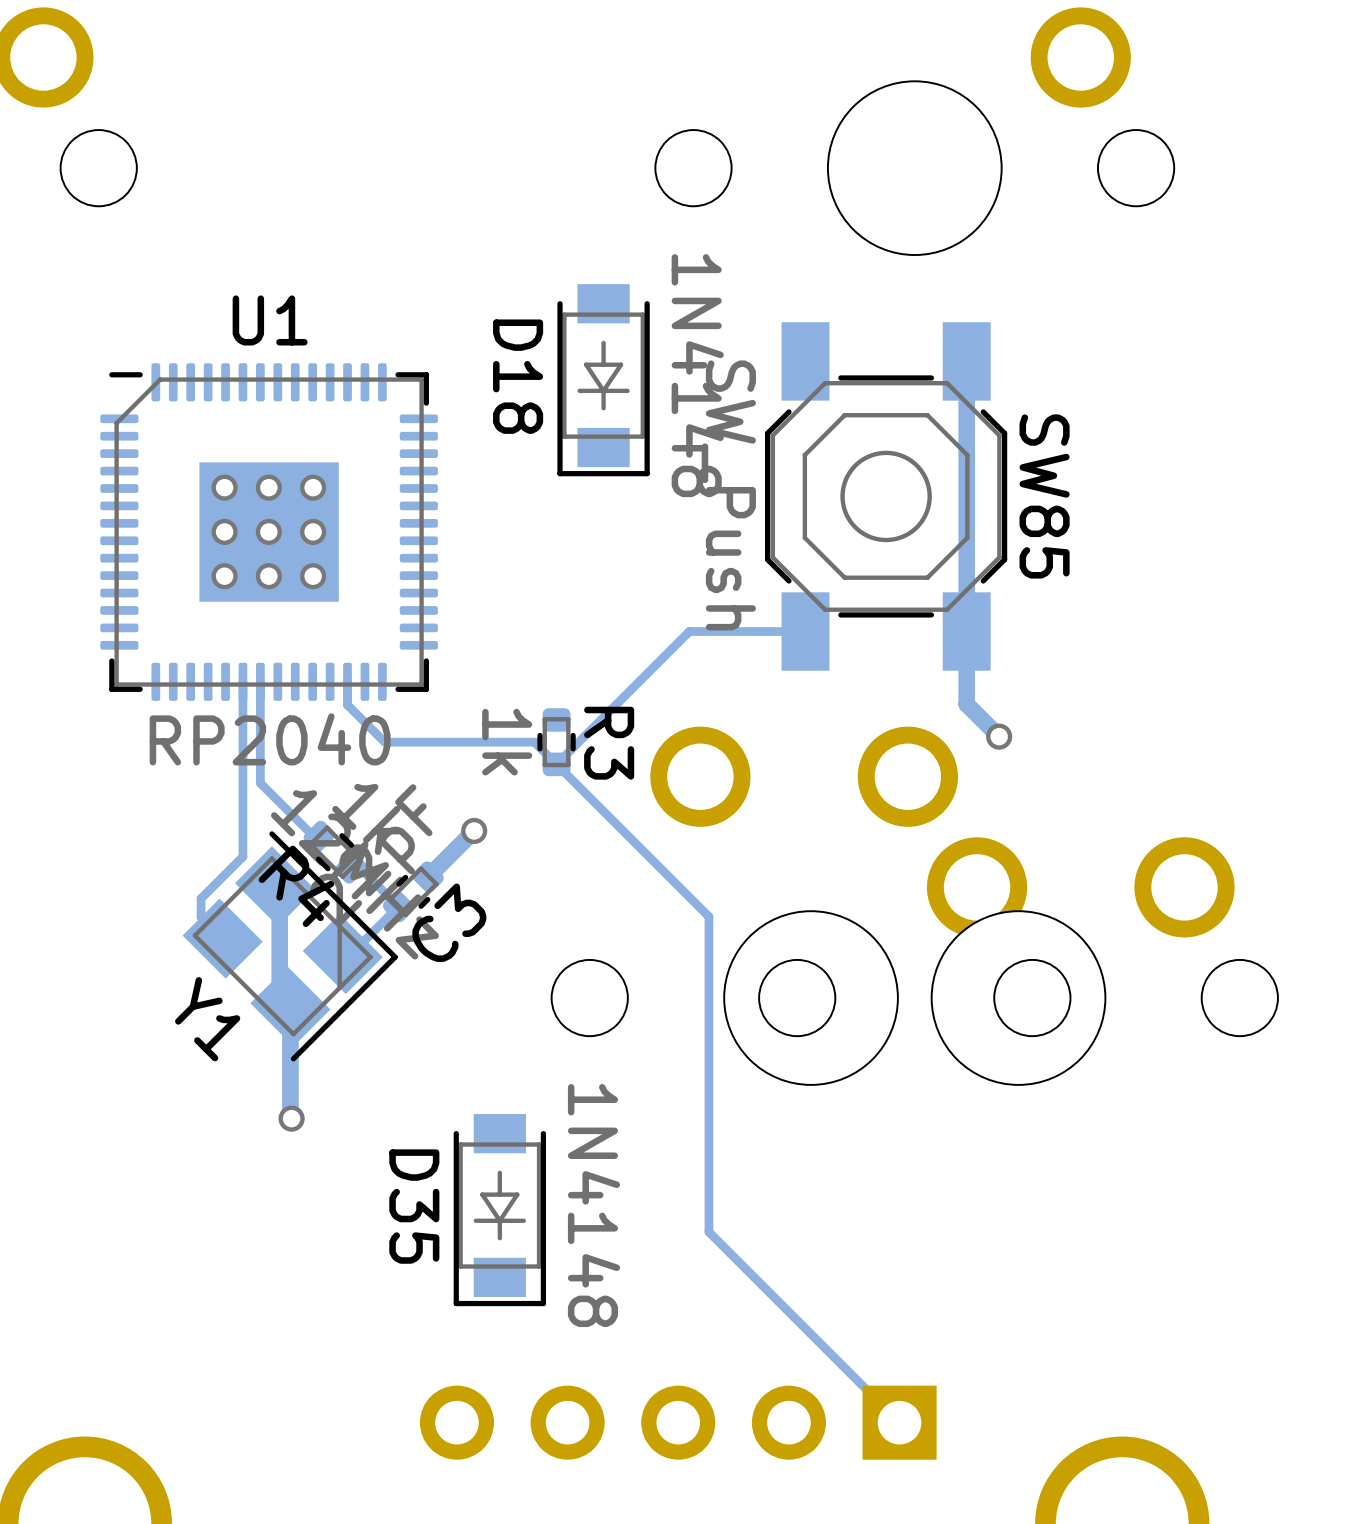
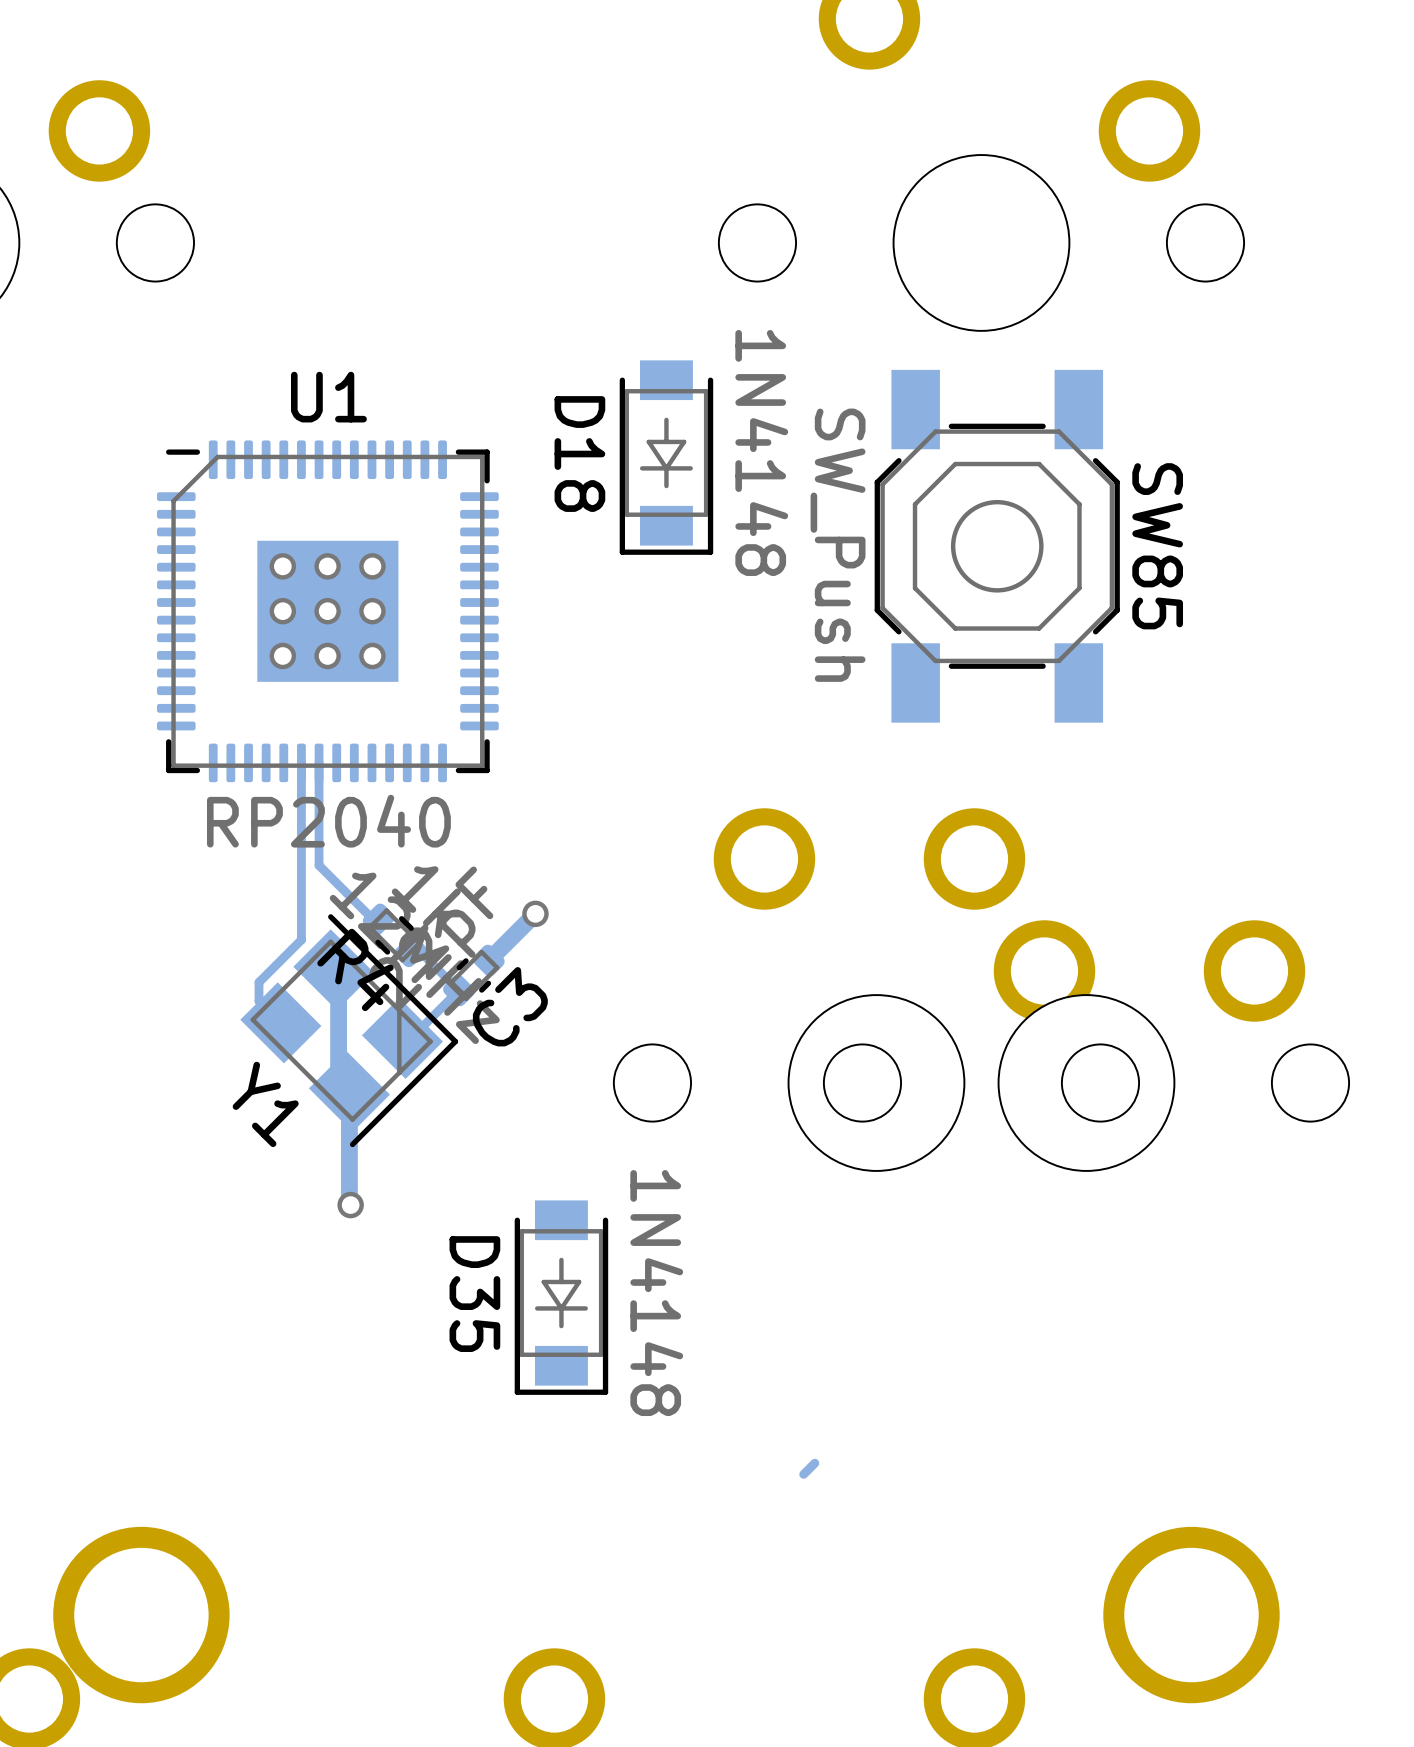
track: (966, 361) (966, 704) (999, 736) -> none
SW85 position: (886, 496) -> (997, 546)
track: (805, 631) (689, 631) (556, 764) -> none
track: (347, 681) (347, 705) (384, 742) (534, 742) (708, 916) (708, 1232) (899, 1422) -> none
via: (999, 736) -> none
R3: 1k (556, 742) -> none
track: none -> (814, 1463) (803, 1474)
part: (678, 1422) -> none

